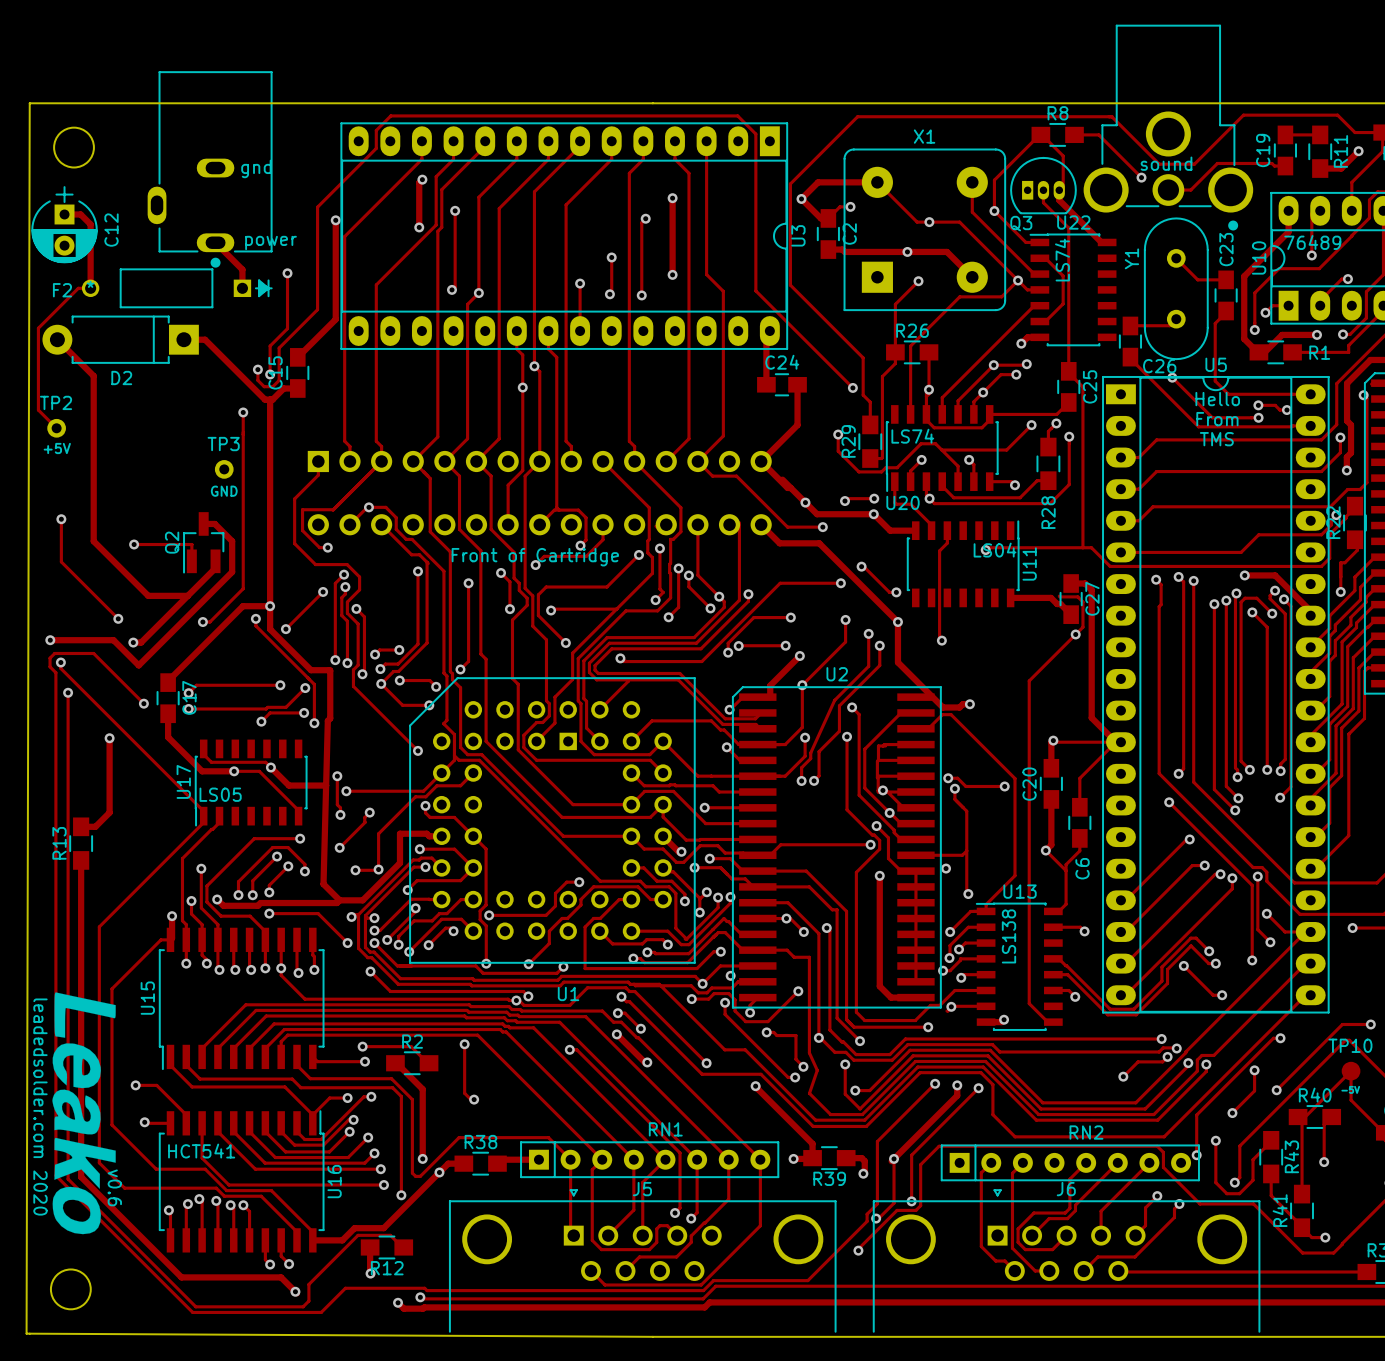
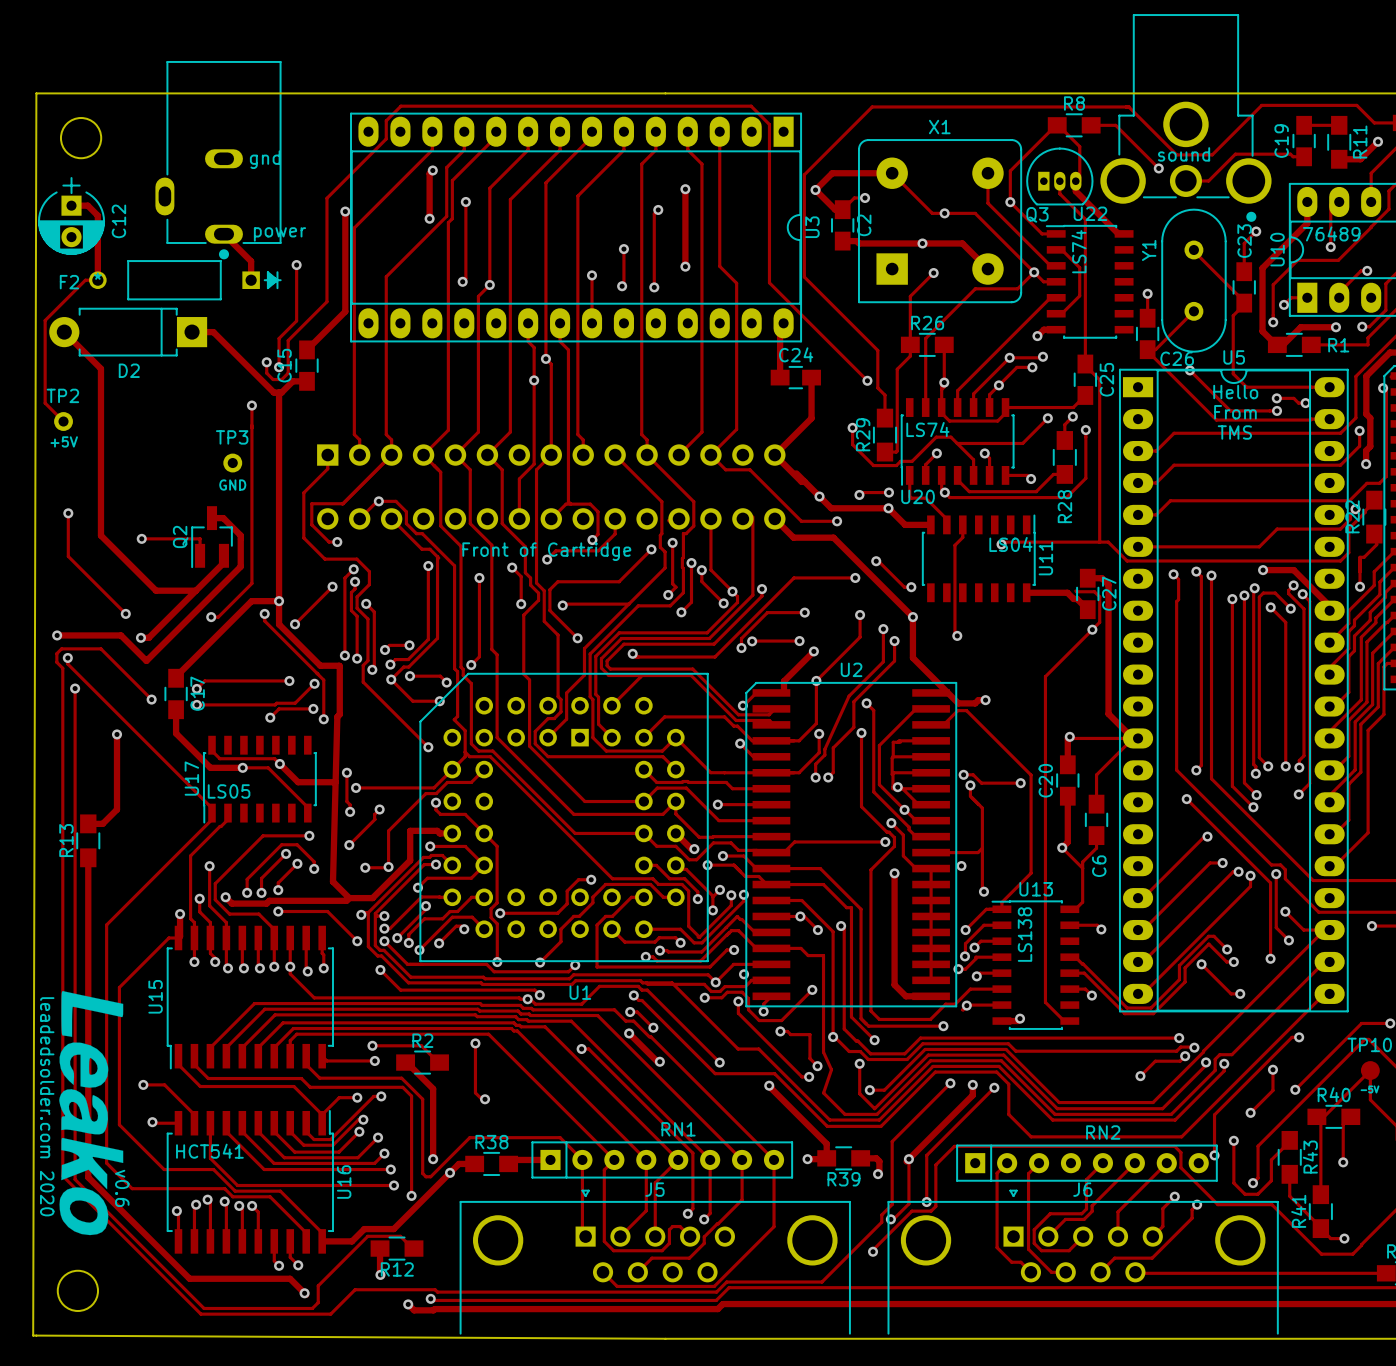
track: none -> (1256, 231) (1244, 243) (1244, 271)
via: none -> (1256, 231)
track: (1176, 258) (1197, 279) (1226, 279) -> (1193, 249) (1244, 303)
track: none -> (1147, 293) (1147, 318)
via: none -> (1147, 293)
track: (1134, 325) (1169, 325) -> (1147, 349) (1155, 349) (1187, 317)

